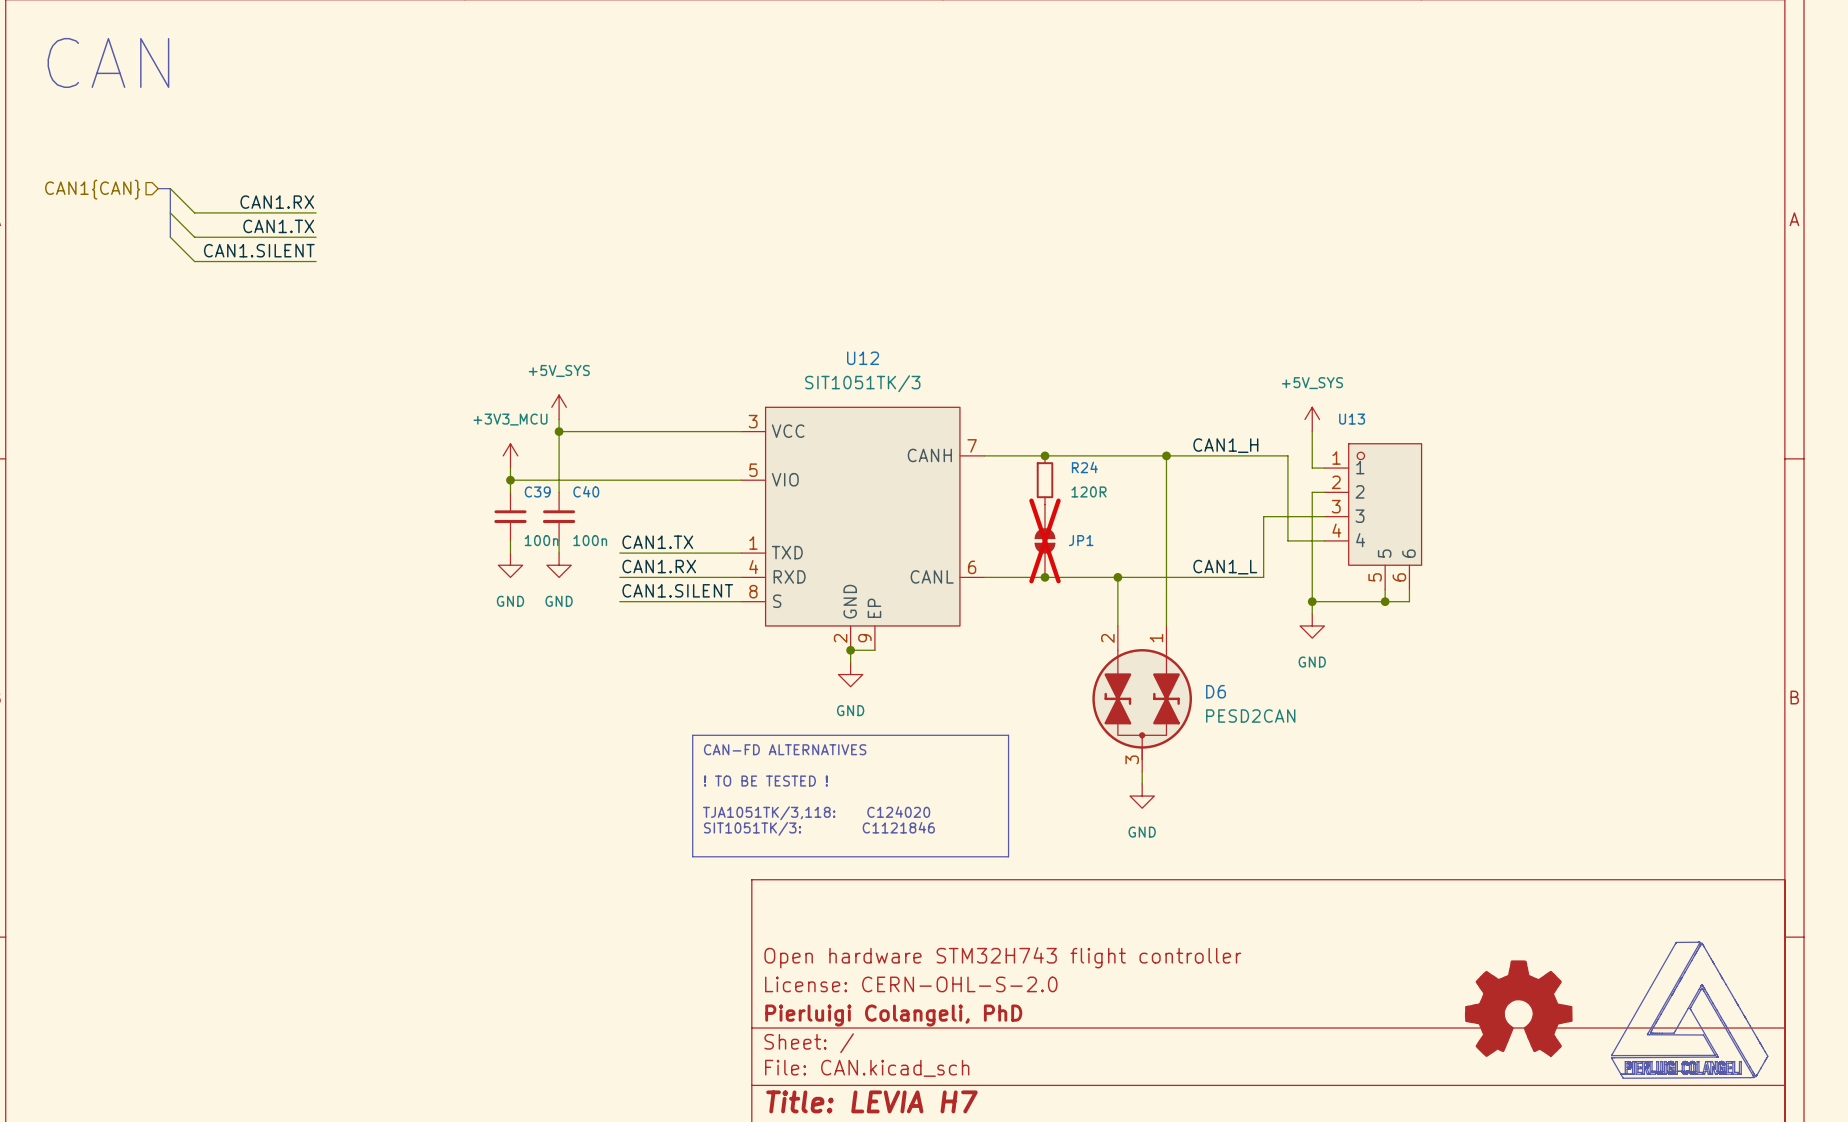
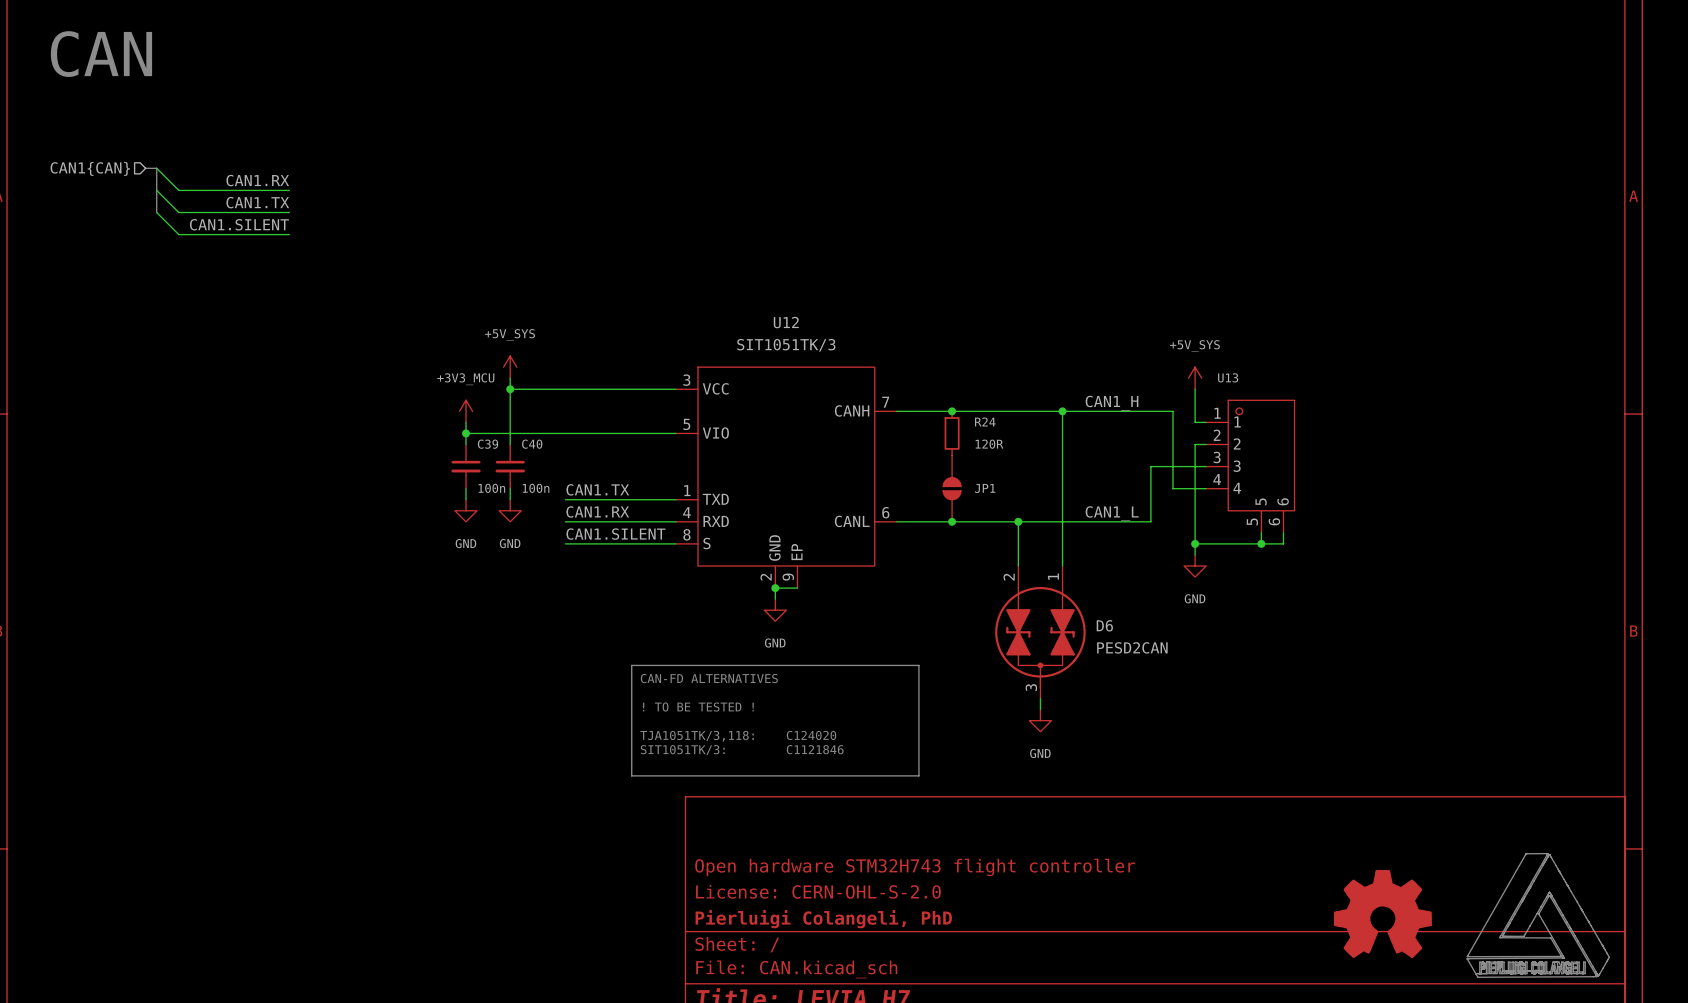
JP1 do-not-place cross: (1044, 540) -> none

